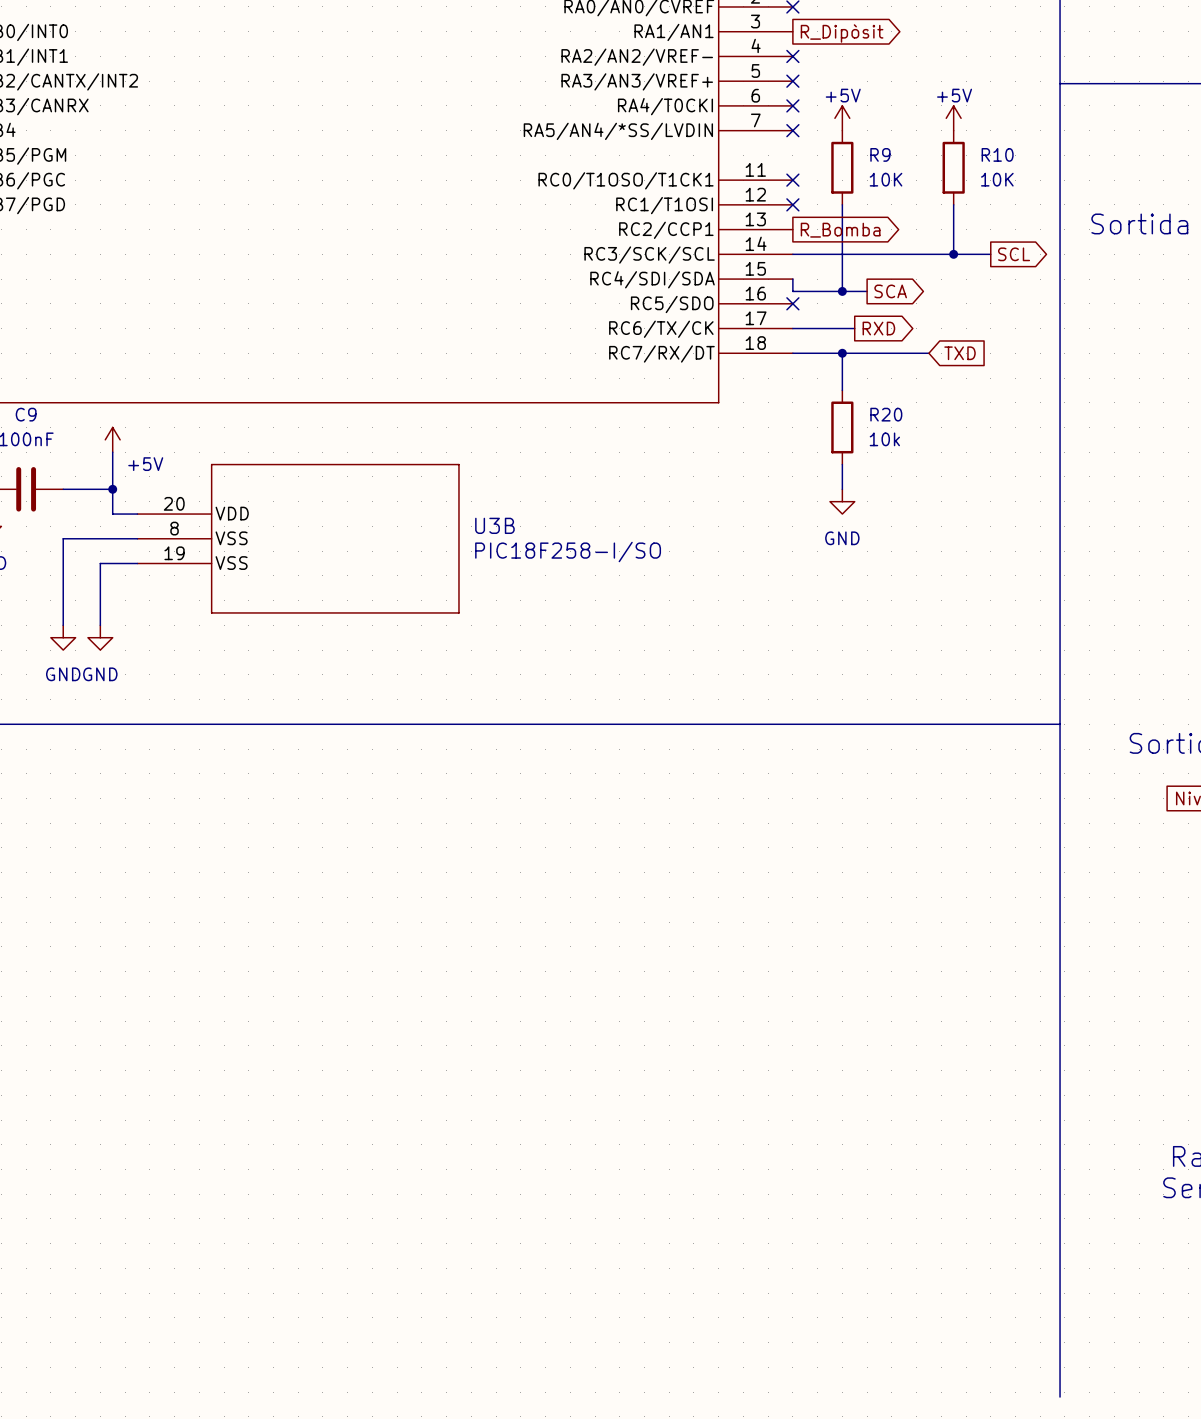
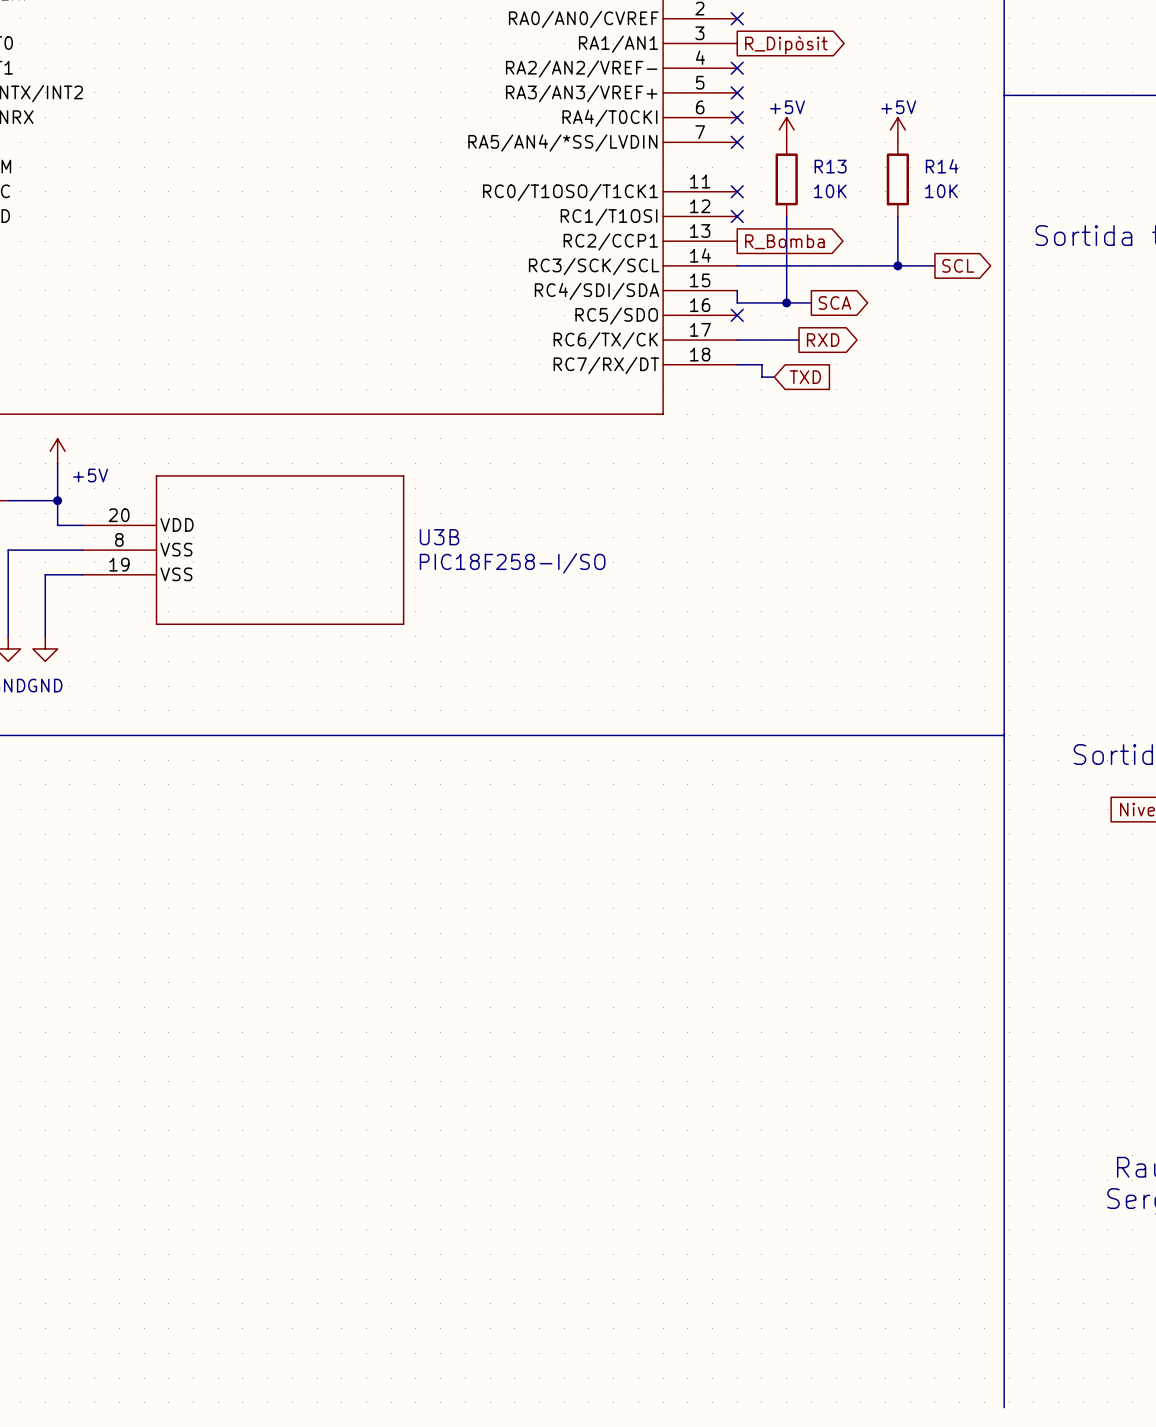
R9 name: R9 (880, 154) -> R13 (830, 166)
R10 name: R10 (997, 154) -> R14 (942, 166)
wire: (817, 353) (928, 353) -> (761, 364) (761, 377) (774, 377)
wire: (842, 353) (842, 390) -> none
junction: (842, 353) -> none
global label position: TXD (960, 353) -> TXD (805, 377)
R20: 10k (842, 427) -> none
wire: (842, 464) (842, 489) -> none
power symbol: GND (842, 501) -> none

